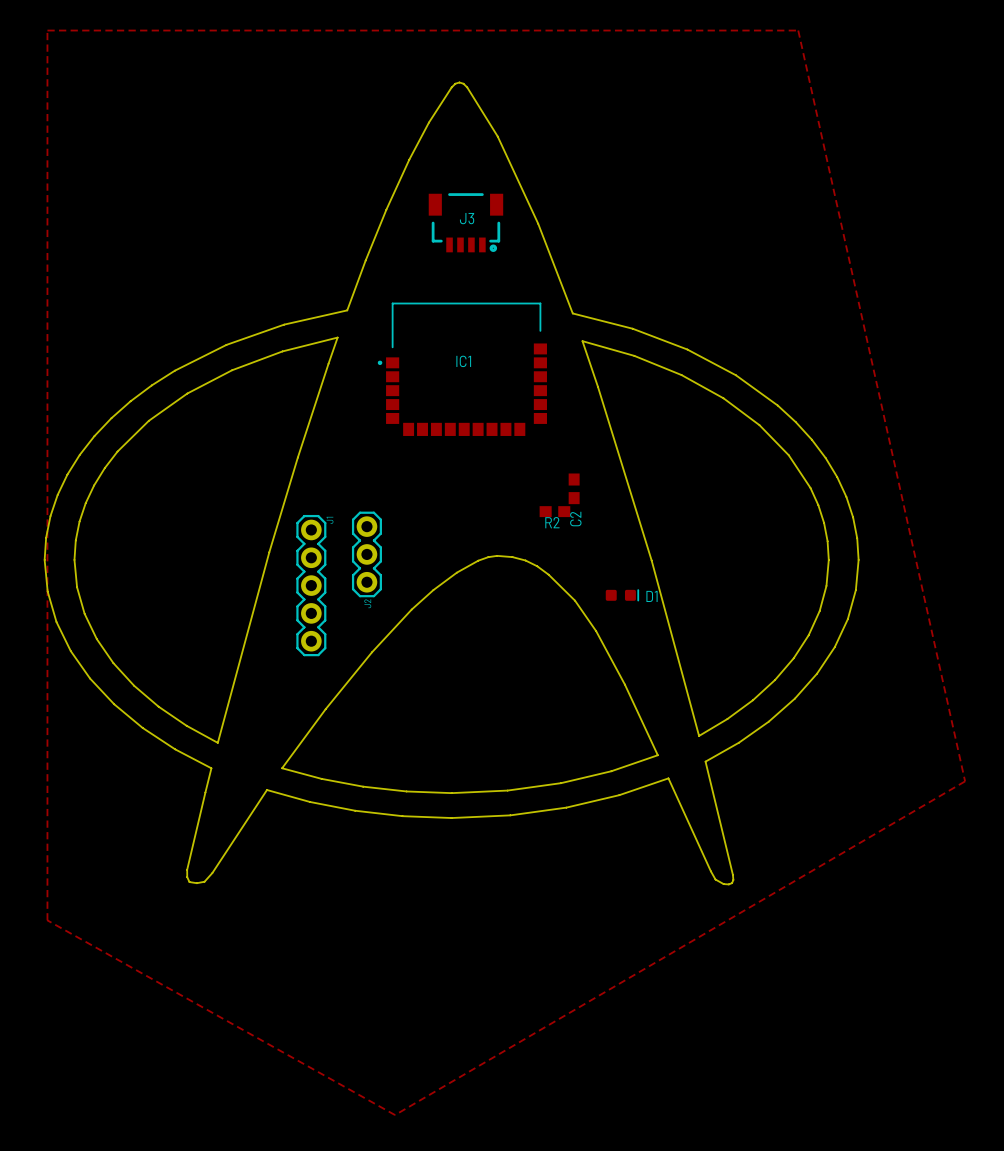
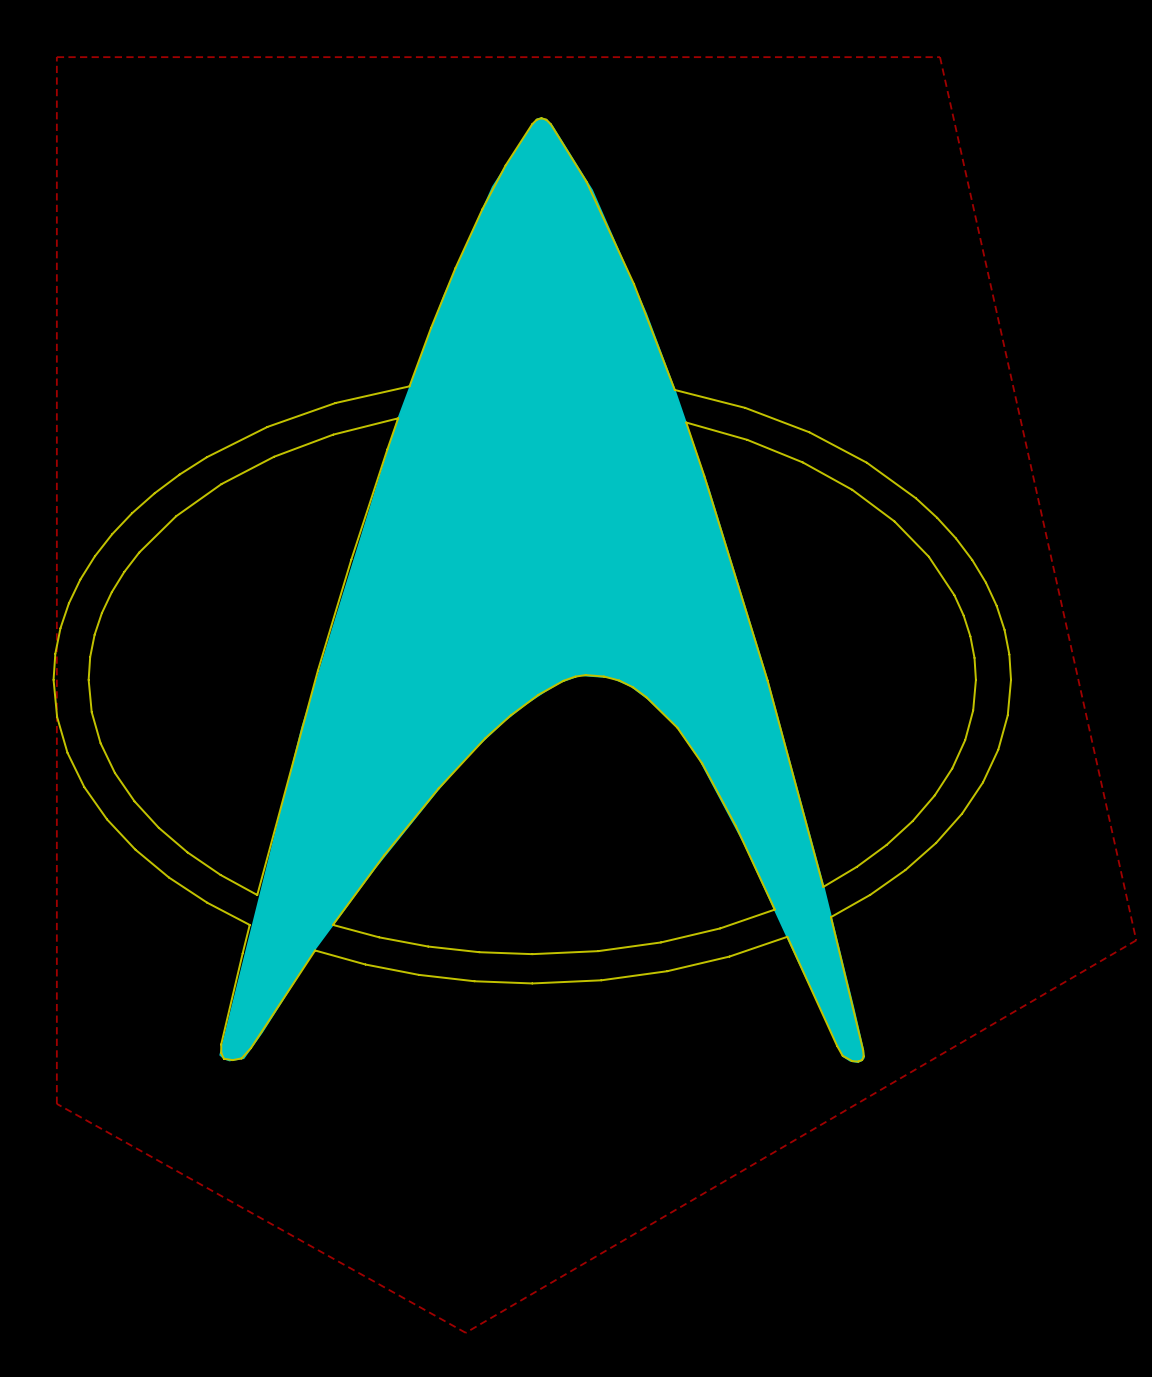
drawing: none -> [219, 117, 865, 1063]

